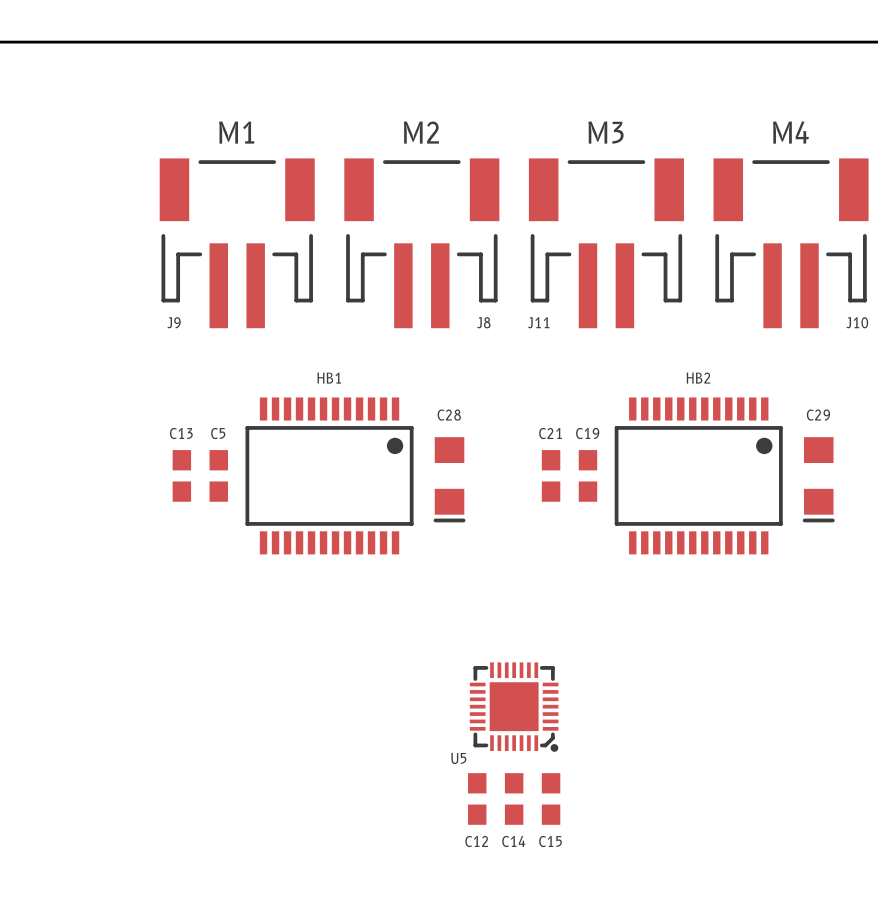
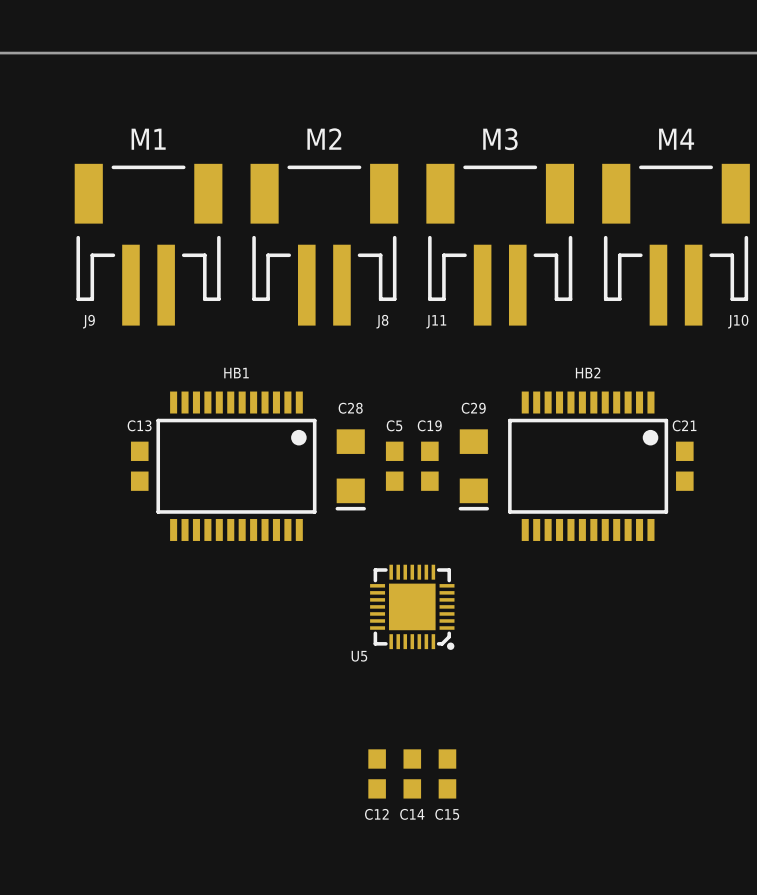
C13 position: (181, 475) -> (139, 466)
C5 position: (218, 475) -> (394, 466)
C21 position: (551, 475) -> (684, 466)
C19 position: (587, 475) -> (429, 466)
C29 position: (818, 479) -> (473, 469)
U5 position: (514, 707) -> (412, 607)

